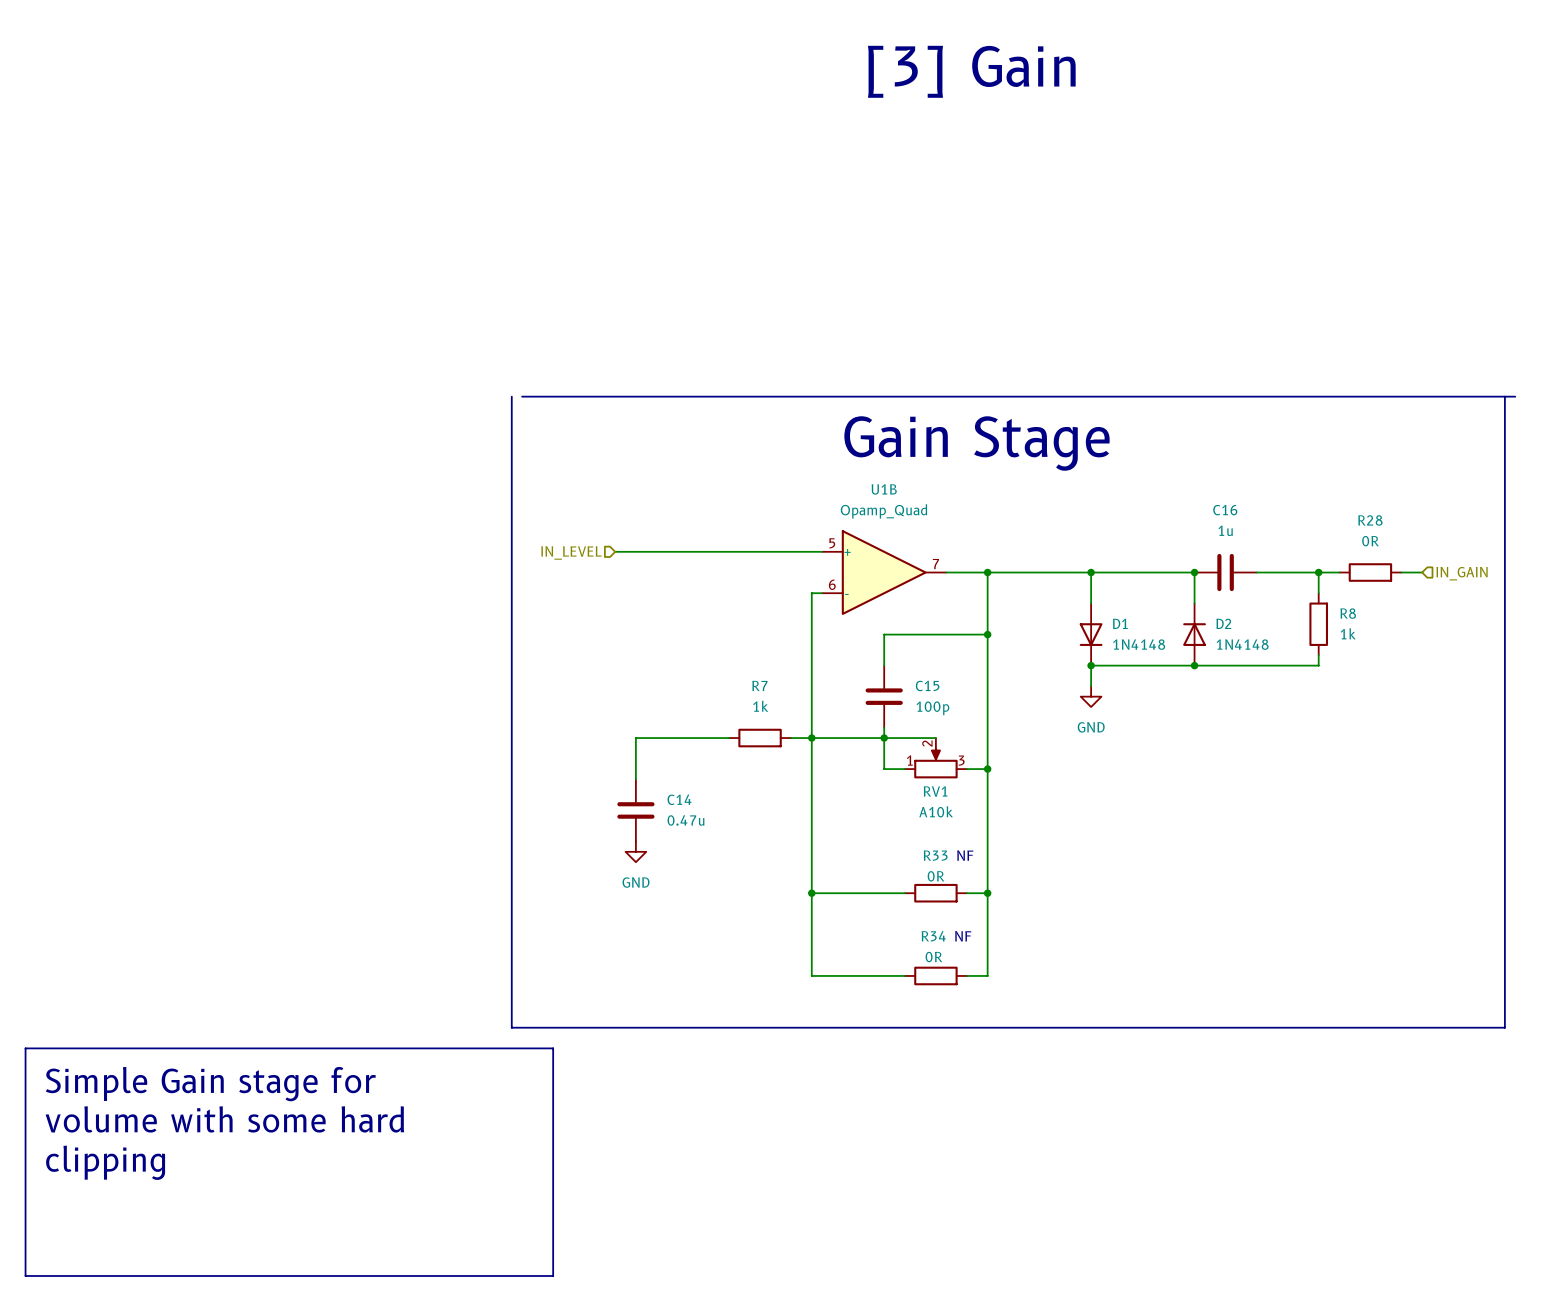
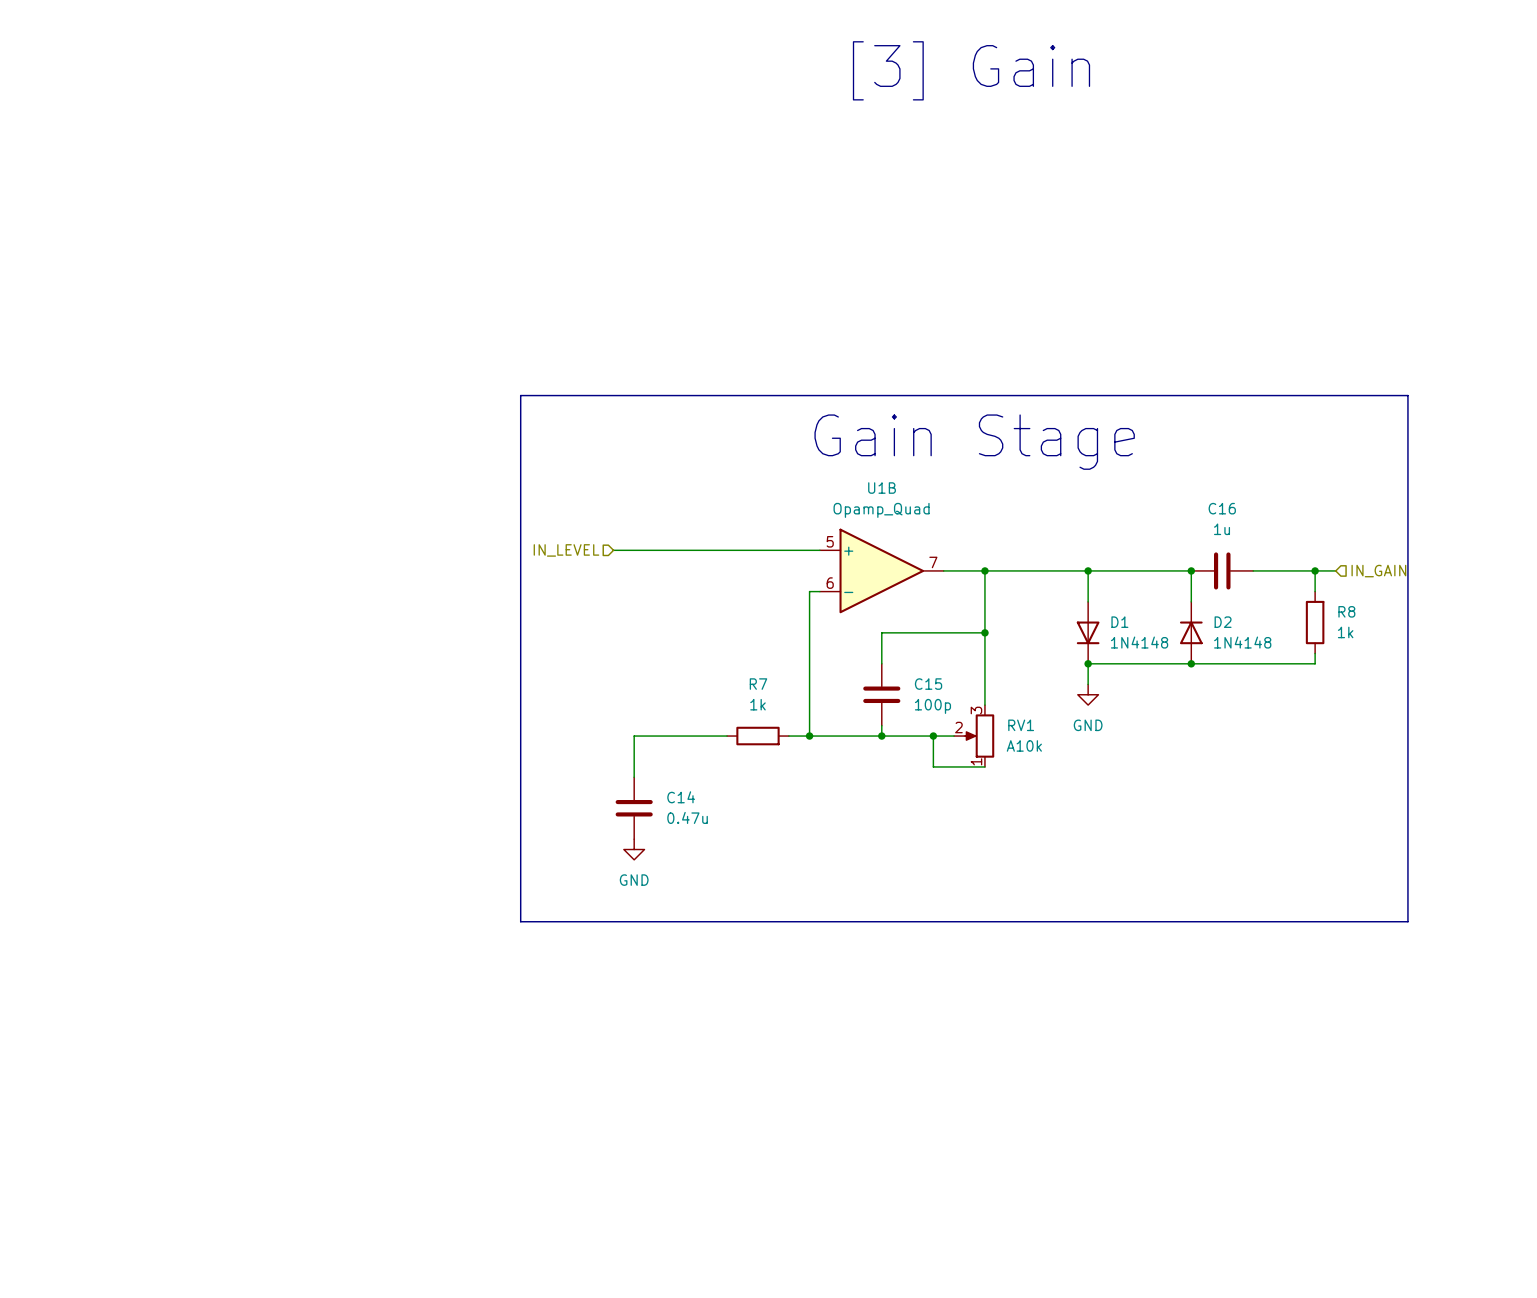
line: (511, 396) (511, 1027) (1504, 1027) (1504, 396) -> none
line: (1411, 396) (1515, 396) -> (1407, 395) (1407, 921) (520, 921) (520, 395)
R28: 0R (1370, 572) -> none
wire: (1401, 572) (1422, 572) -> none
hierarchical label position: IN_GAIN (1462, 573) -> IN_GAIN (1378, 571)
wire: (987, 707) (987, 975) (966, 975) -> none
wire: (811, 738) (811, 975) (904, 975) -> none
wire: (884, 738) (884, 769) (904, 769) -> none
junction: none -> (933, 736)
wire: none -> (954, 736) (933, 736) (933, 766) (964, 766)
RV1 position: (935, 758) -> (974, 736)
RV1 rotation: 0° (935, 763) -> 90° counterclockwise (979, 736)
junction: (987, 769) -> none
RV1 name position: RV1 (935, 791) -> RV1 (1021, 725)
text: NF (965, 855) -> none
wire: (811, 893) (904, 893) -> none
junction: (811, 893) -> none
R33: 0R (935, 893) -> none
wire: (966, 893) (987, 893) -> none
junction: (987, 893) -> none
text: NF (963, 936) -> none
R34: 0R (935, 975) -> none
line: (25, 1048) (553, 1048) (553, 1275) (25, 1275) (25, 1048) -> none
text: Simple Gain stage for (210, 1084) -> none
text: volume with some hard (224, 1119) -> none
text: clipping (105, 1162) -> none

